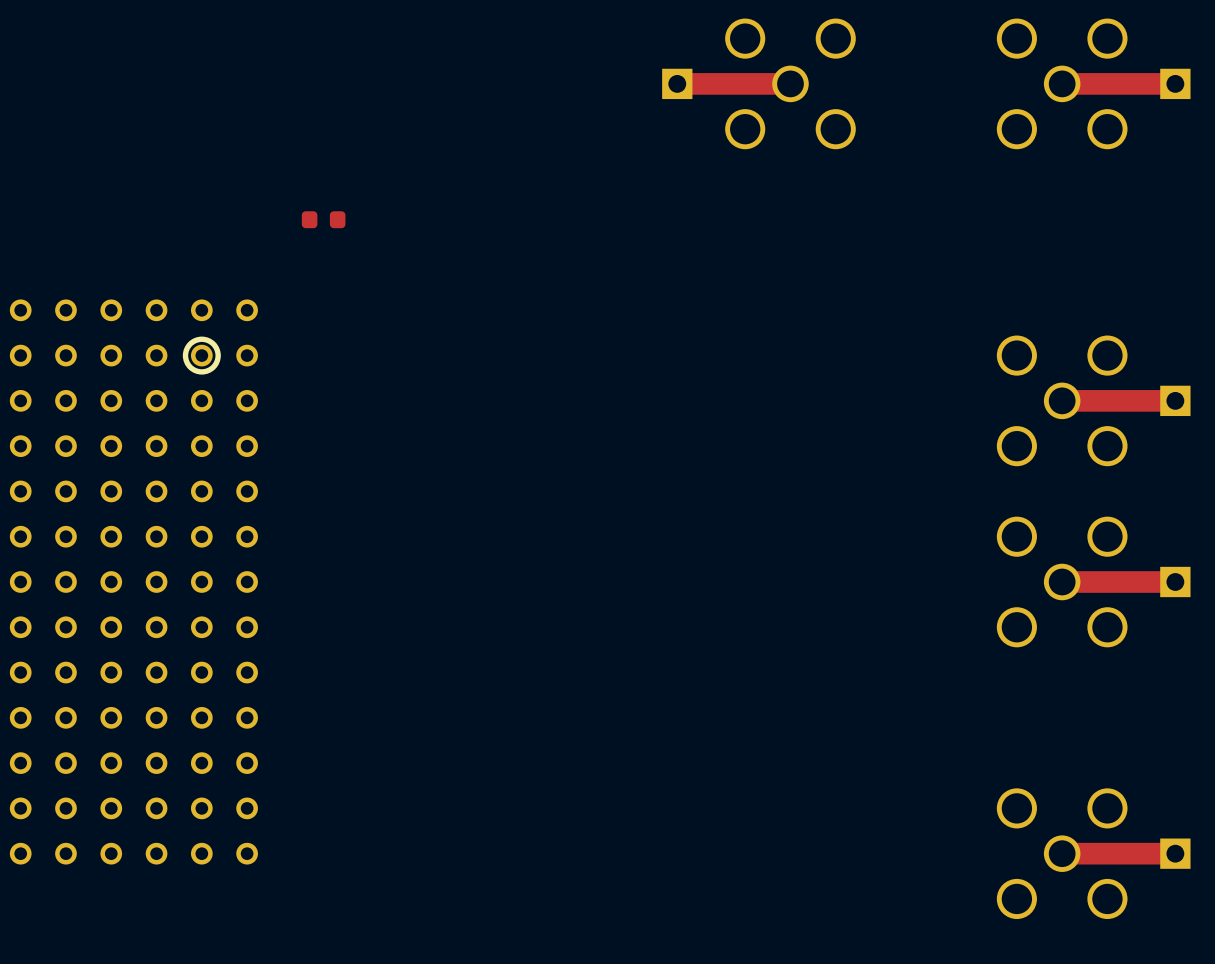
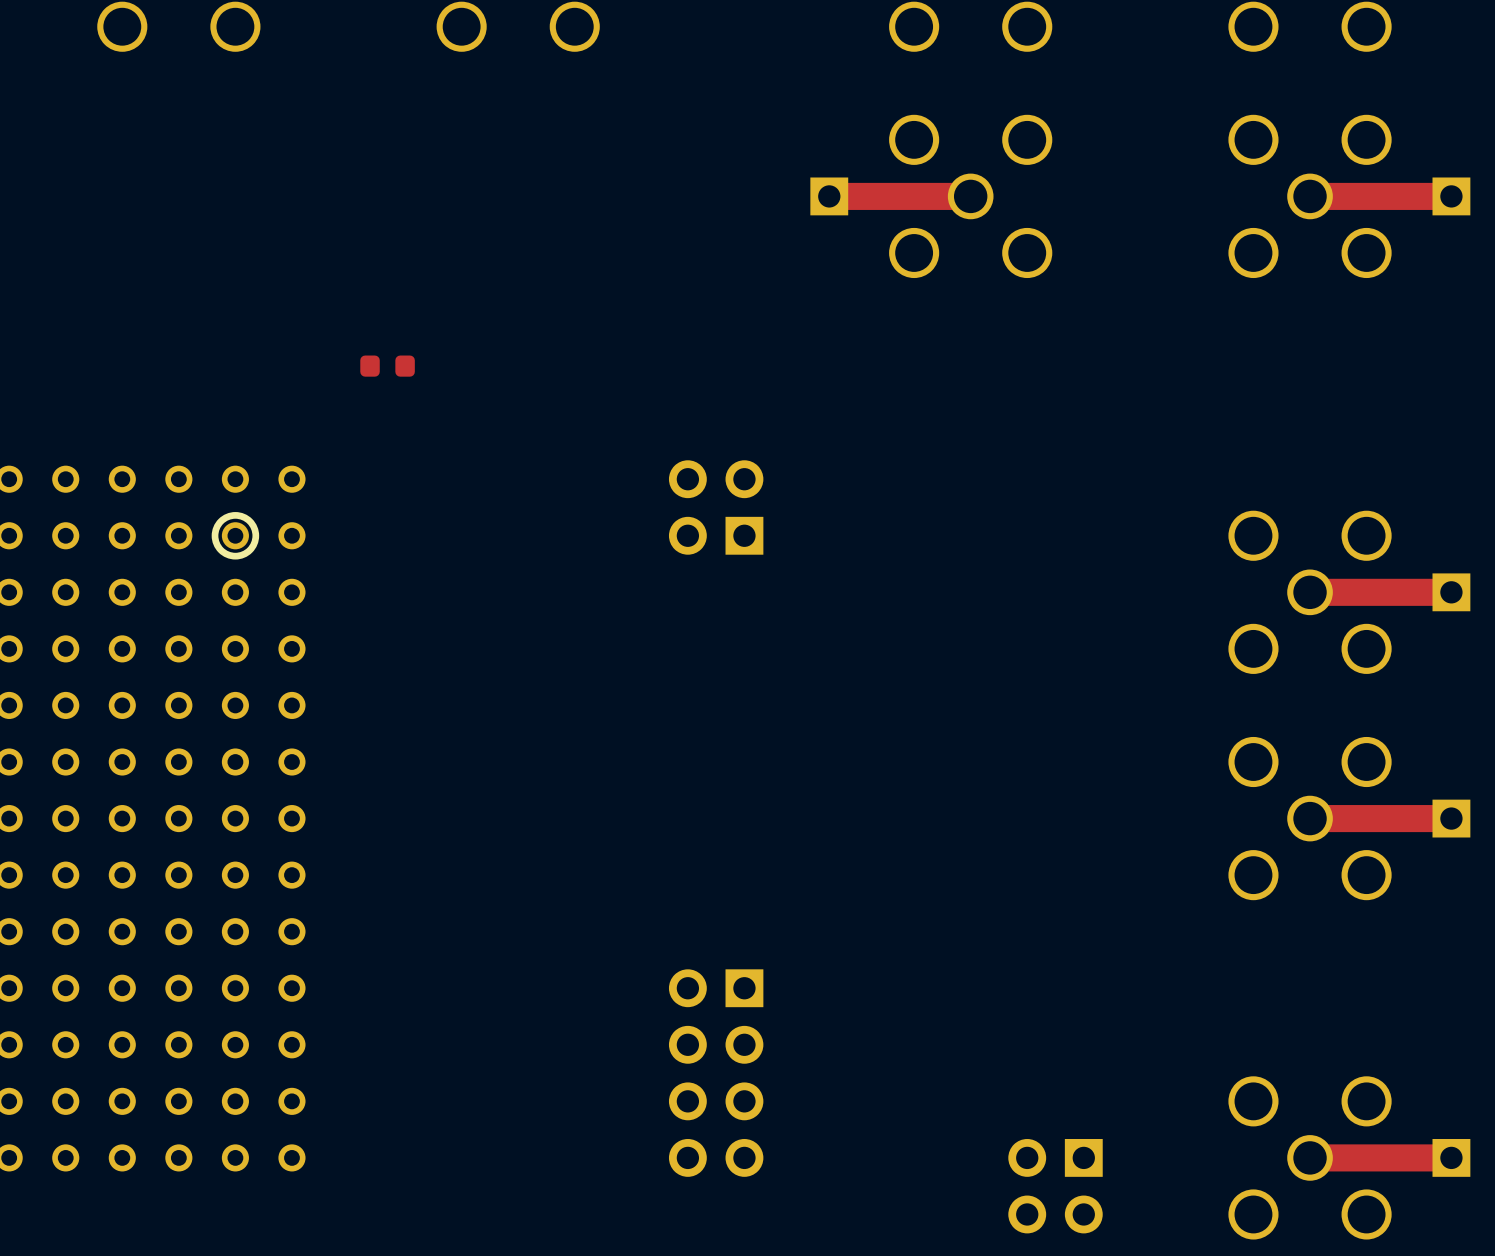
part: none -> (716, 507)
part: none -> (716, 1073)
part: none -> (1055, 1186)

